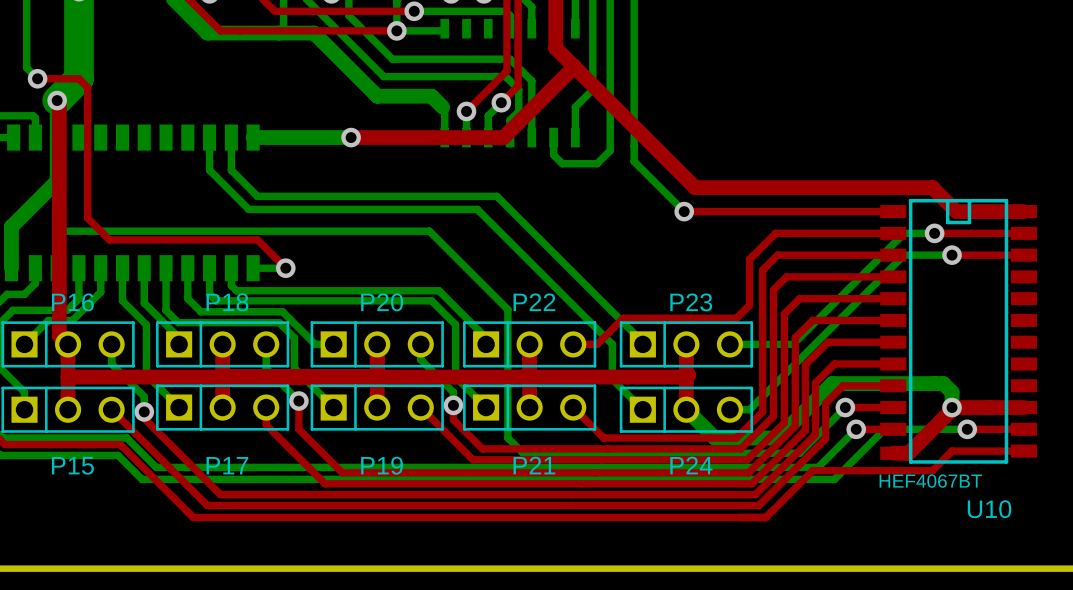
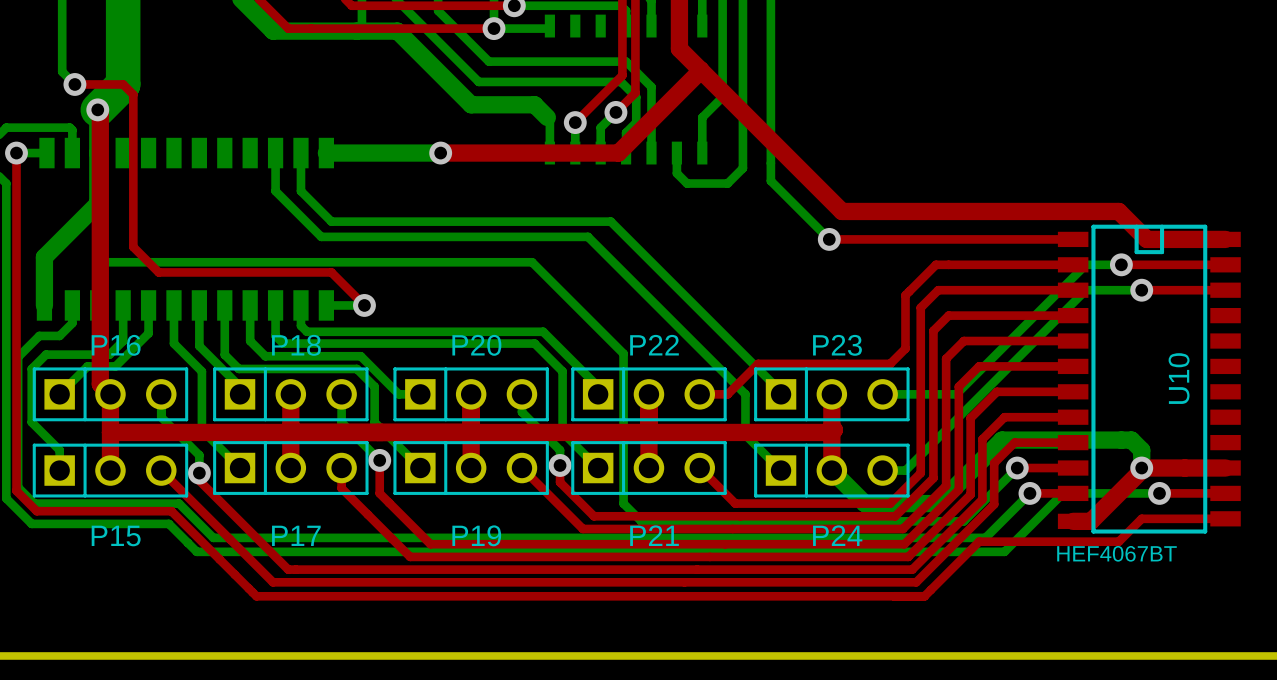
U10 name rotation: 0° (989, 509) -> 90° counterclockwise (1179, 378)
U10 name position: U10 (989, 509) -> U10 (1179, 378)

